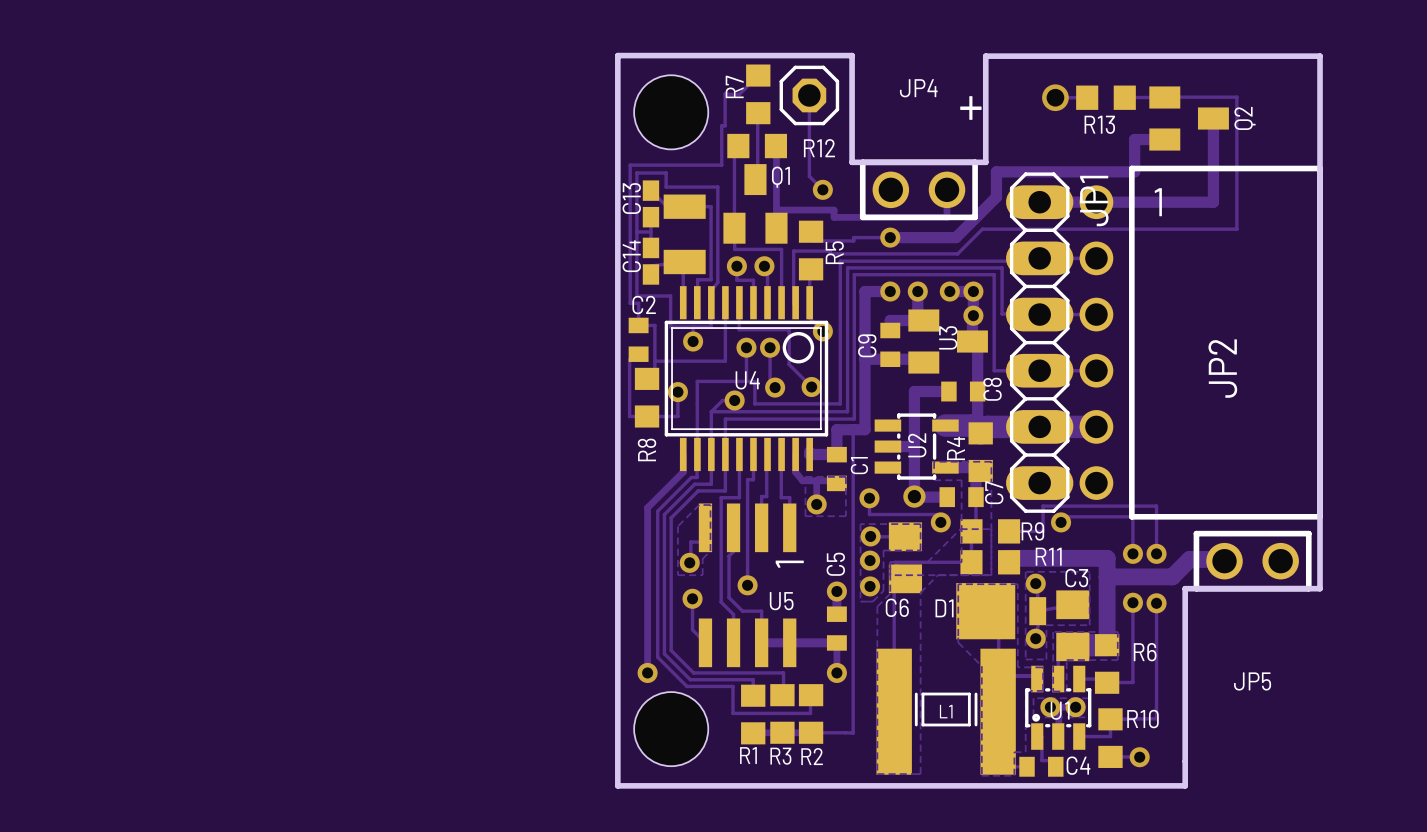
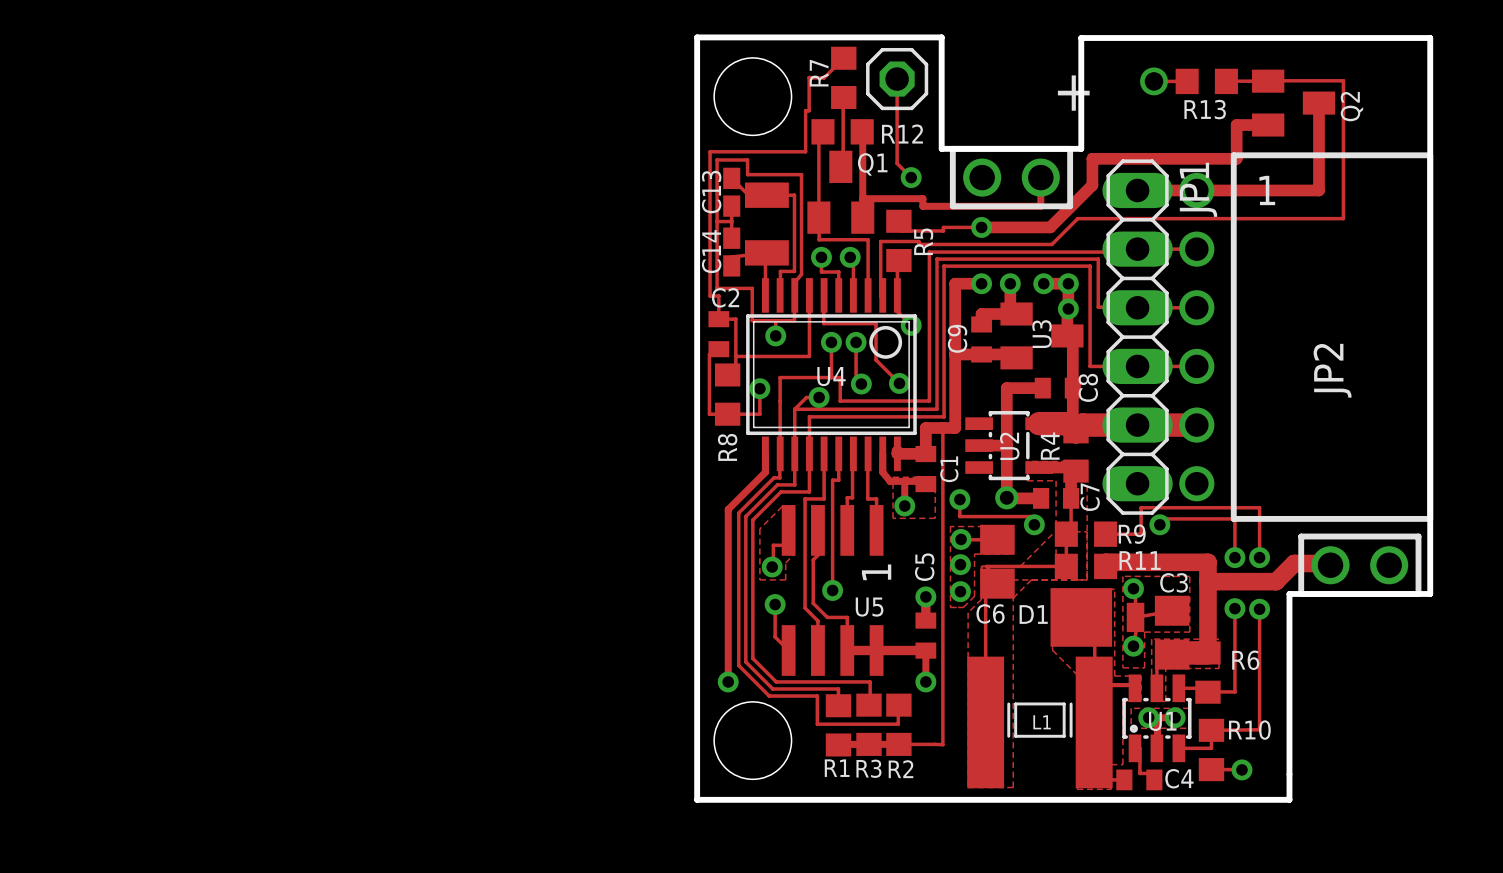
JP4 name: JP4 (918, 88) -> none
JP5 name: JP5 (1252, 681) -> none

